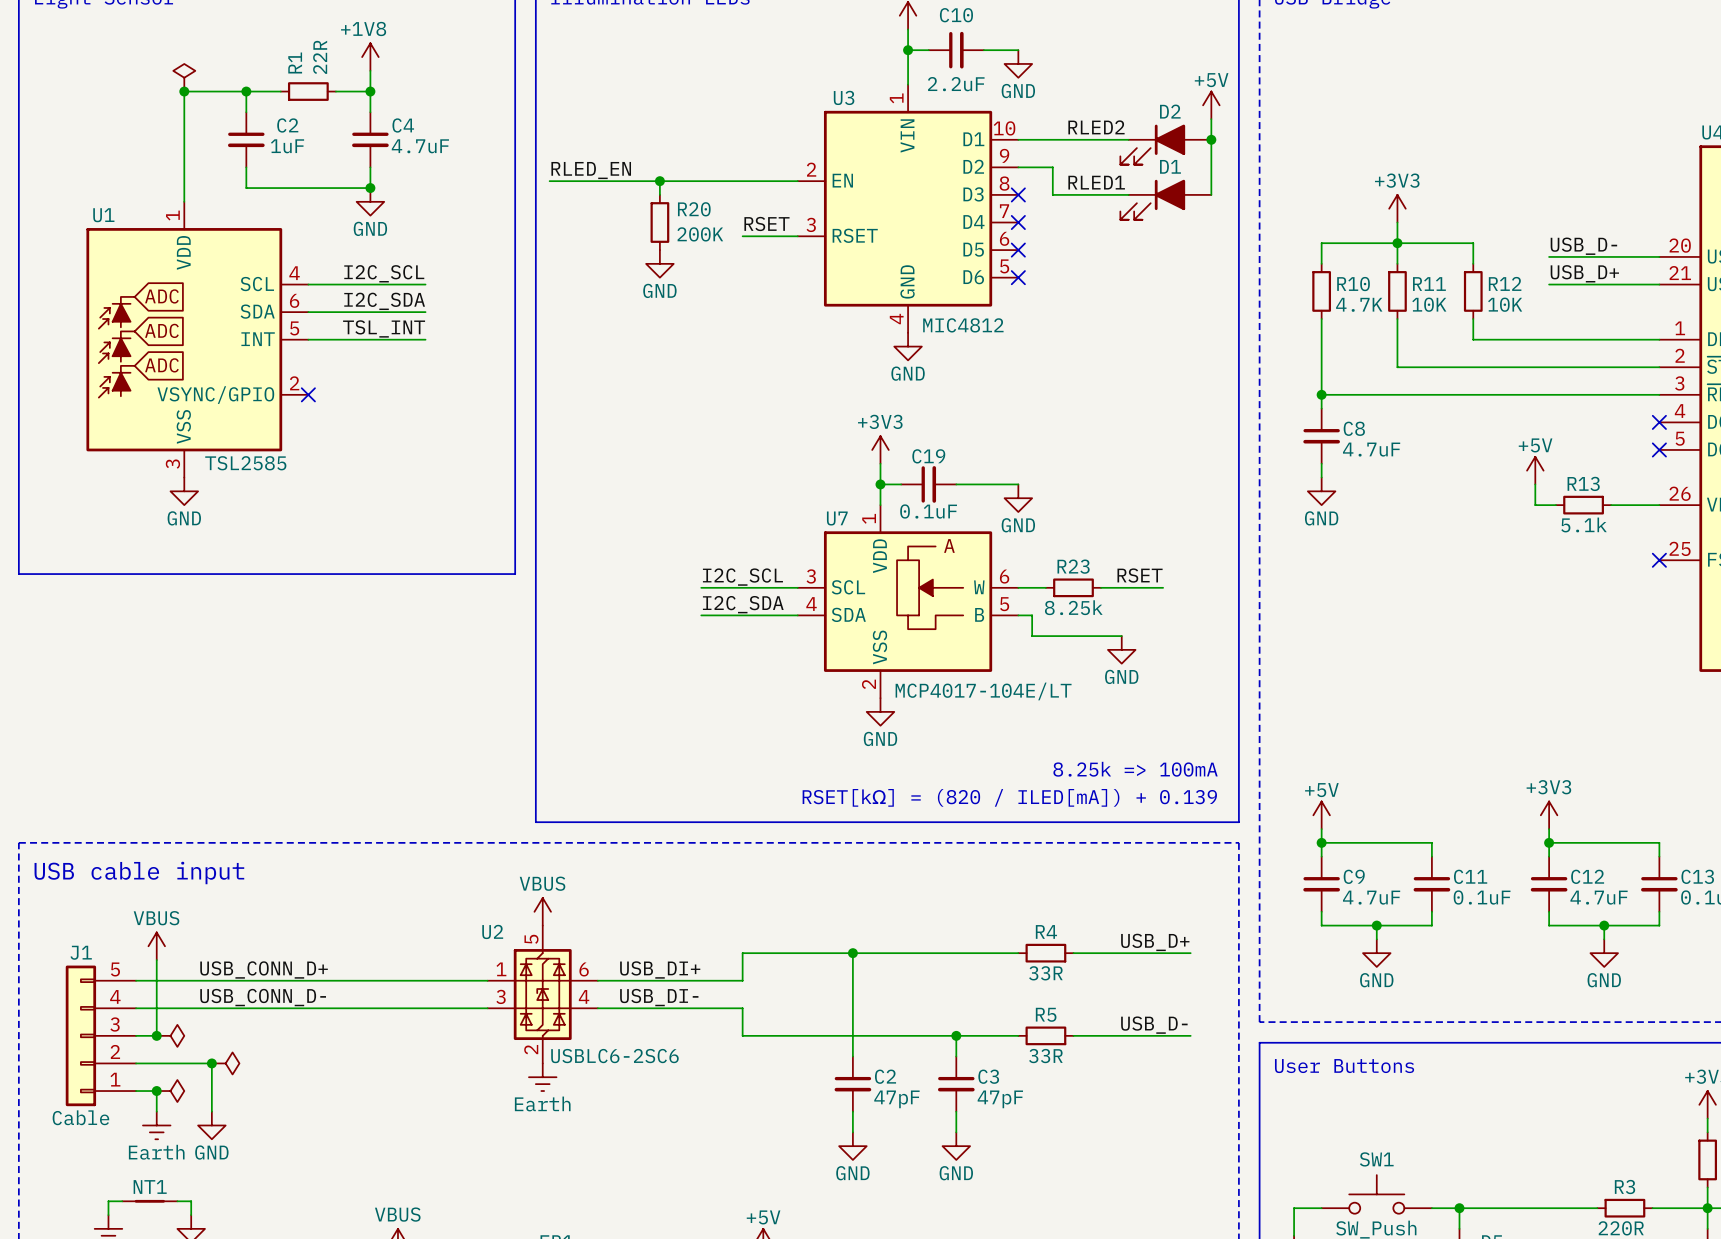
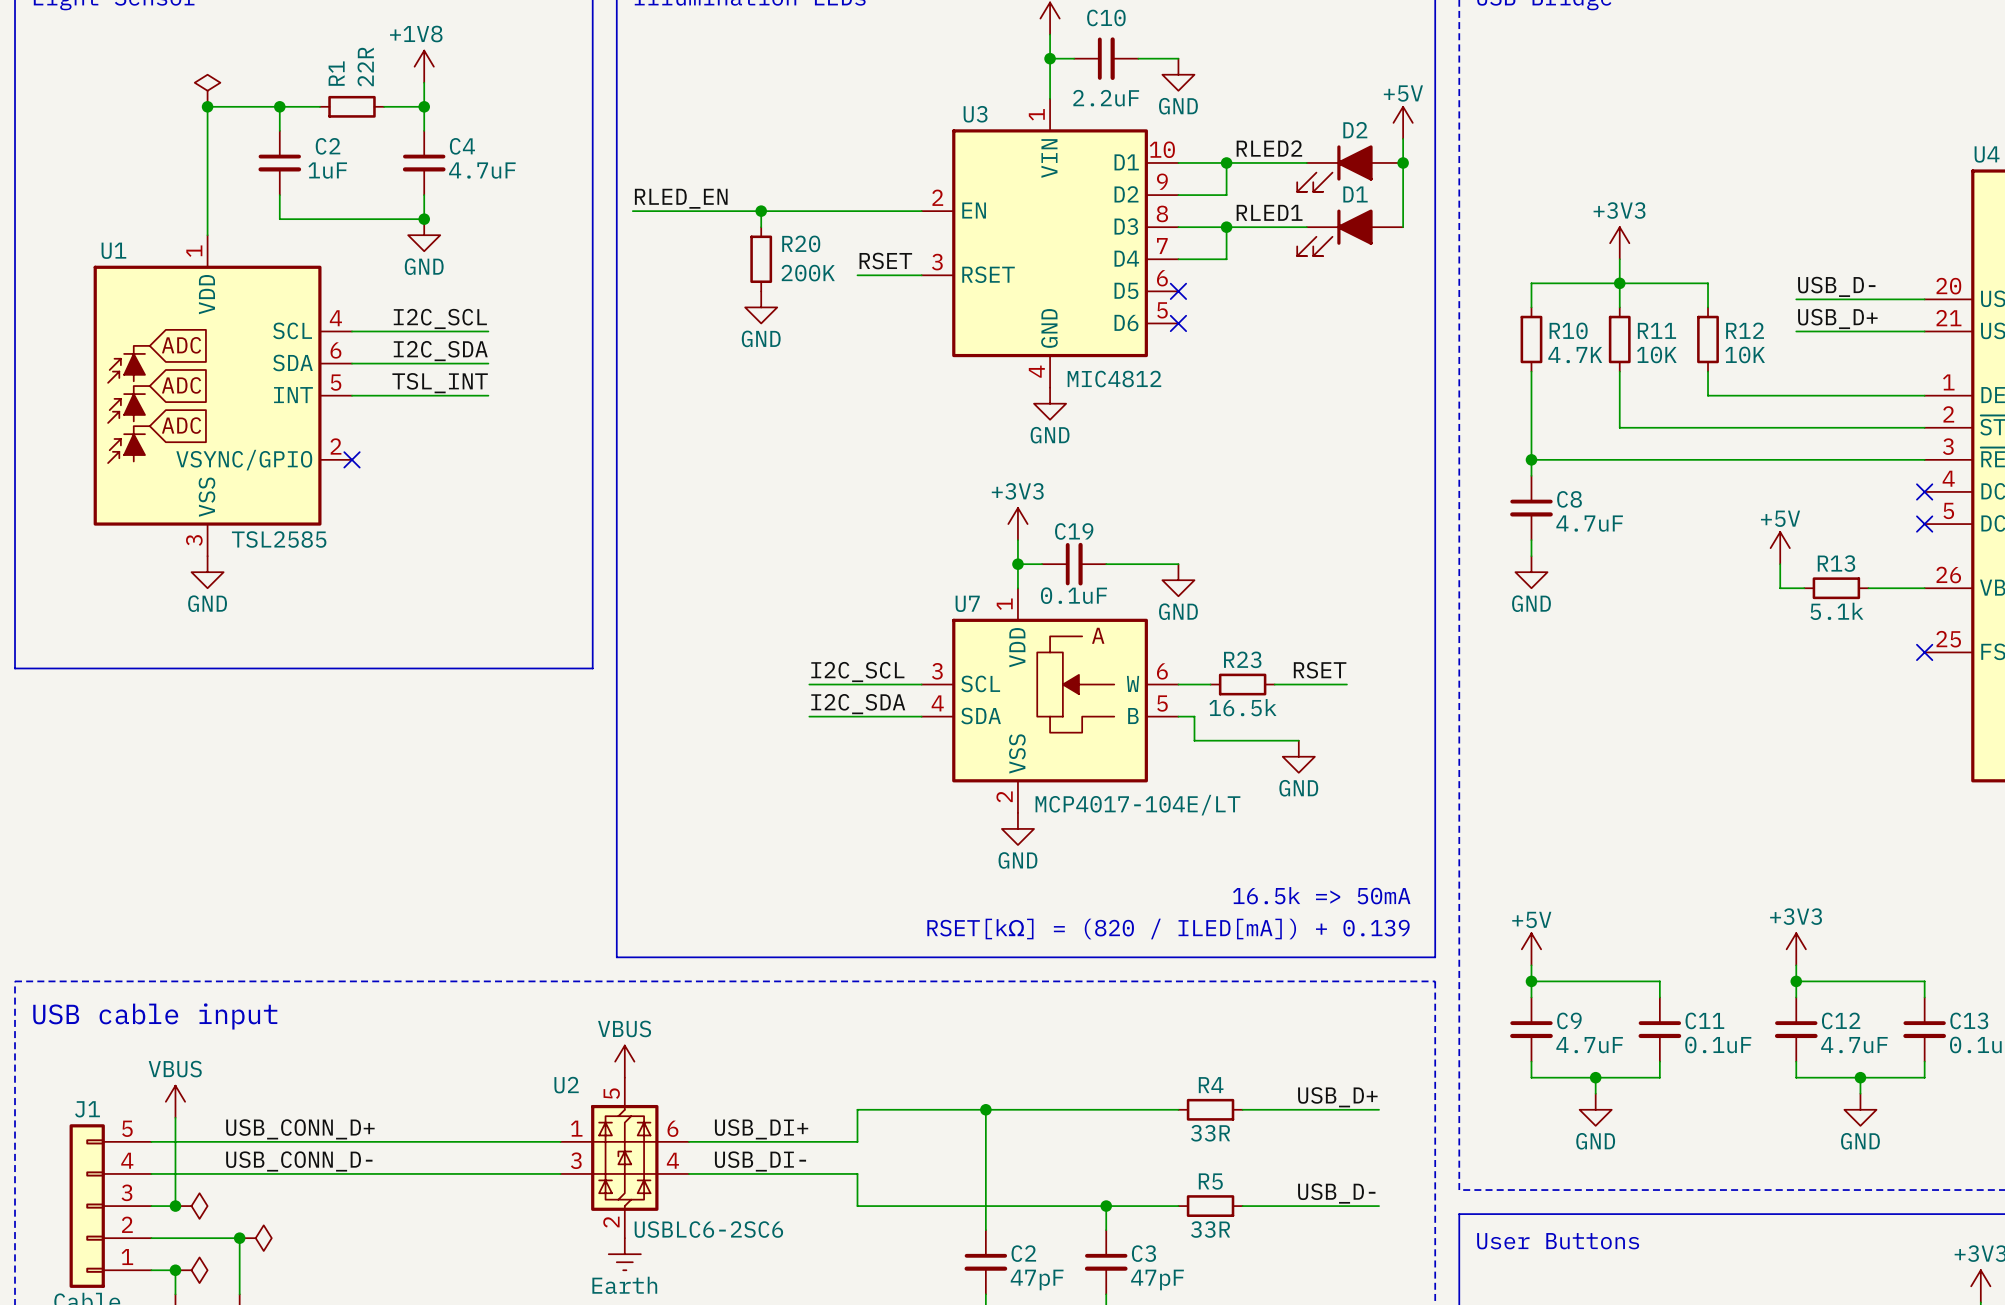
wire: none -> (1226, 162) (1226, 195) (1218, 195)
junction: none -> (1226, 162)
wire: (1052, 167) (1052, 194) -> (1178, 227) (1218, 227)
no-connect mark: (1018, 194) -> none
wire: none -> (1226, 227) (1226, 259) (1178, 259)
junction: none -> (1226, 227)
no-connect mark: (1018, 222) -> none
R23 value: 8.25k (1073, 607) -> 16.5k (1242, 707)
text: 8.25k => 100mA (1135, 769) -> 16.5k => 50mA (1321, 895)

